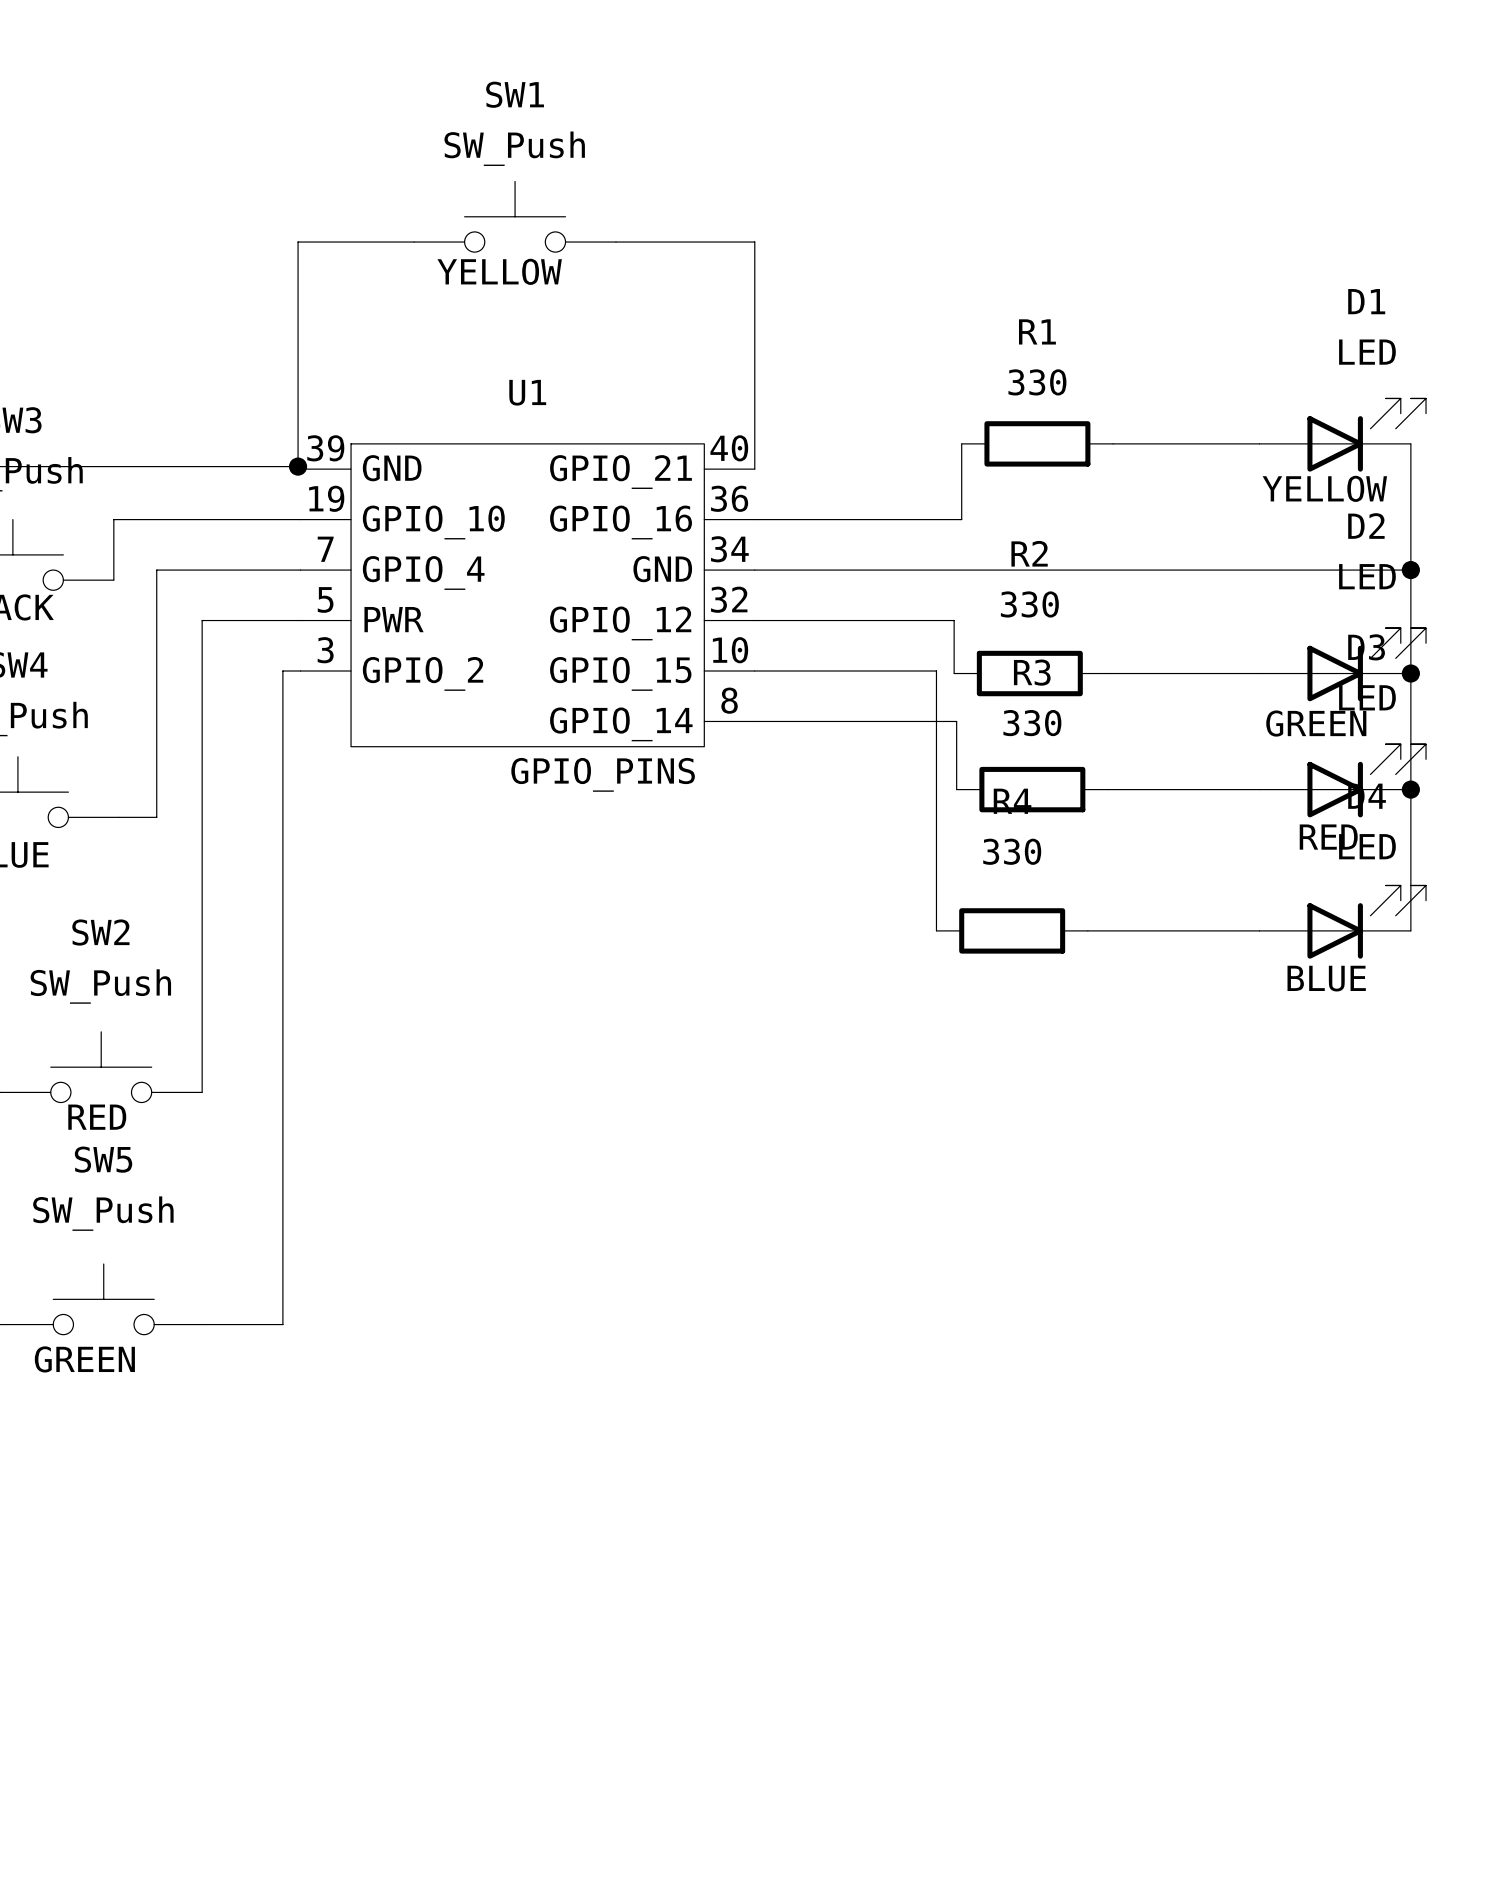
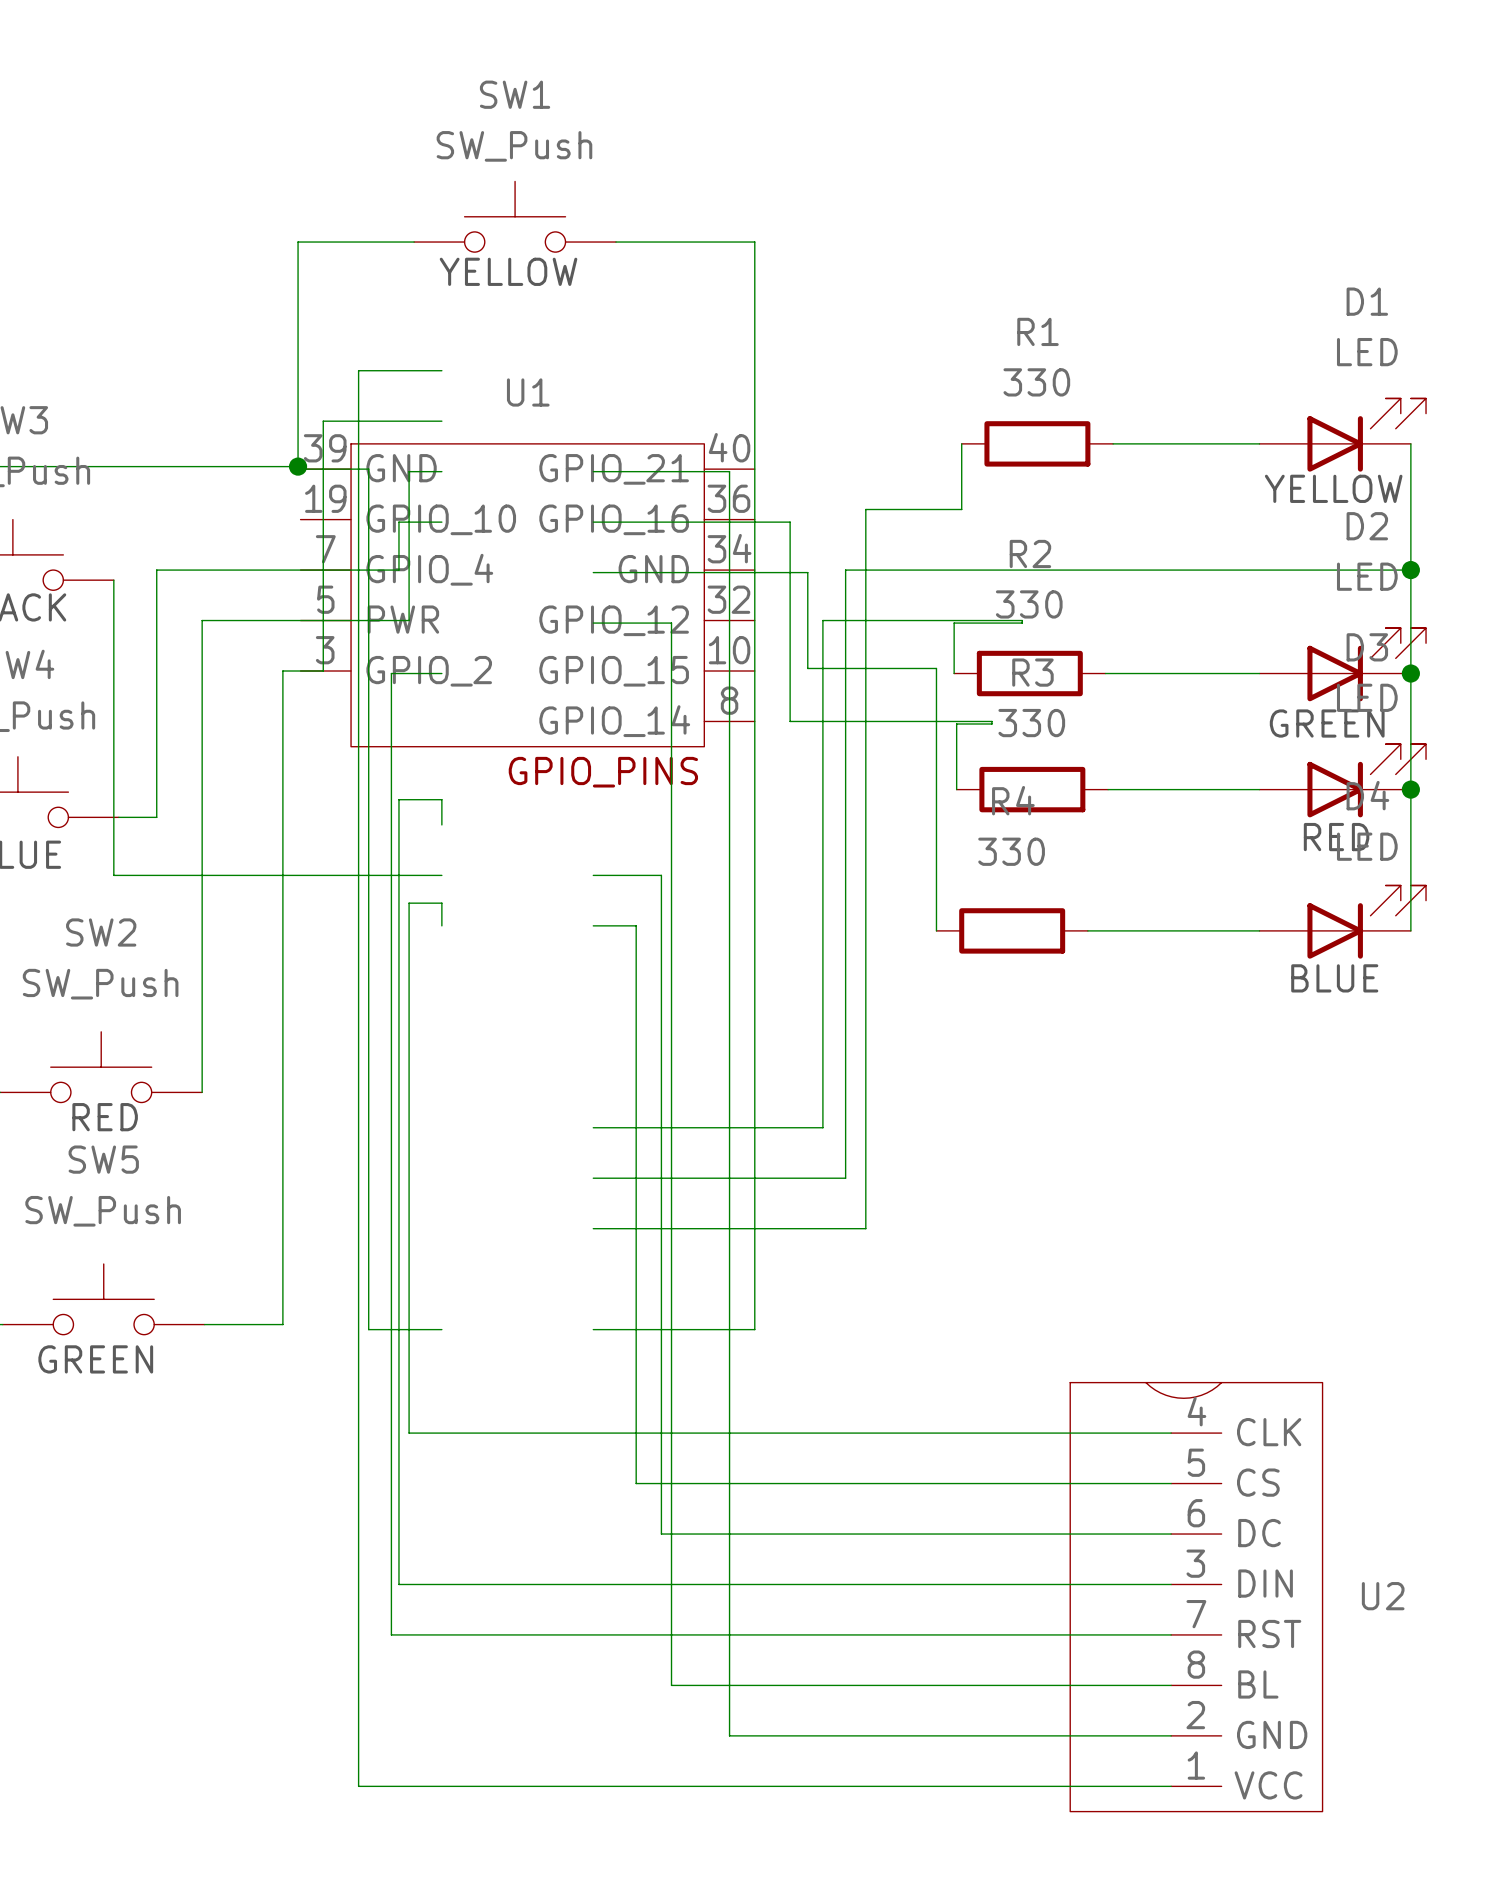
wire: none -> (441, 370) (358, 370) (358, 1786) (1171, 1786)
wire: none -> (441, 421) (323, 421) (323, 671) (300, 671)
wire: none -> (300, 469) (368, 469) (368, 1329) (441, 1329)
wire: none -> (754, 469) (754, 1329) (593, 1329)
wire: none -> (441, 471) (409, 471) (409, 620) (300, 620)
wire: none -> (593, 471) (729, 471) (729, 1735) (1171, 1735)
wire: (961, 509) (961, 519) (754, 519) -> (961, 509) (865, 509) (865, 1228) (593, 1228)
wire: (300, 519) (113, 519) (113, 580) -> (441, 875) (113, 875) (113, 580)
wire: none -> (441, 522) (398, 522) (398, 570) (300, 570)
wire: (754, 570) (845, 570) -> (593, 1178) (845, 1178) (845, 570)
wire: (754, 620) (822, 620) -> (593, 1127) (822, 1127) (822, 620)
wire: (954, 620) (954, 623) -> (954, 620) (1022, 620) (1022, 623) (954, 623)
wire: none -> (593, 623) (671, 623) (671, 1685) (1171, 1685)
wire: (754, 671) (936, 671) -> (593, 572) (807, 572) (807, 668) (936, 668) (936, 671)
wire: none -> (441, 673) (391, 673) (391, 1634) (1171, 1634)
wire: (754, 721) (790, 721) -> (593, 522) (790, 522) (790, 721)
wire: (956, 721) (956, 723) -> (956, 721) (991, 721) (991, 723) (956, 723)
wire: none -> (441, 824) (441, 799) (398, 799) (398, 1584) (1171, 1584)
wire: none -> (593, 875) (661, 875) (661, 1534) (1171, 1534)
wire: none -> (441, 925) (441, 903) (409, 903) (409, 1433) (1171, 1433)
wire: none -> (593, 925) (636, 925) (636, 1483) (1171, 1483)
U2: none -> (1196, 1597)

